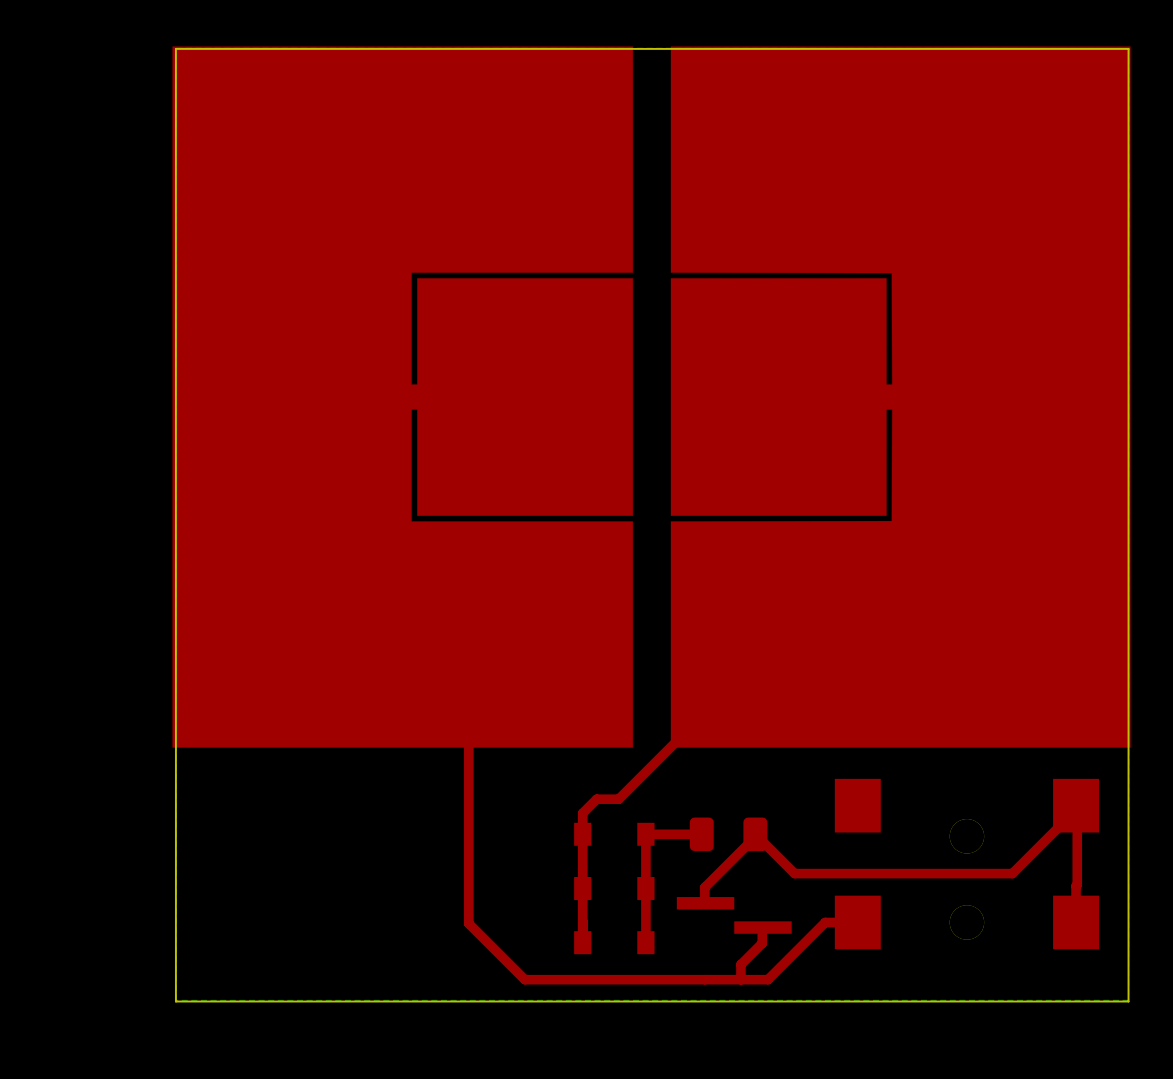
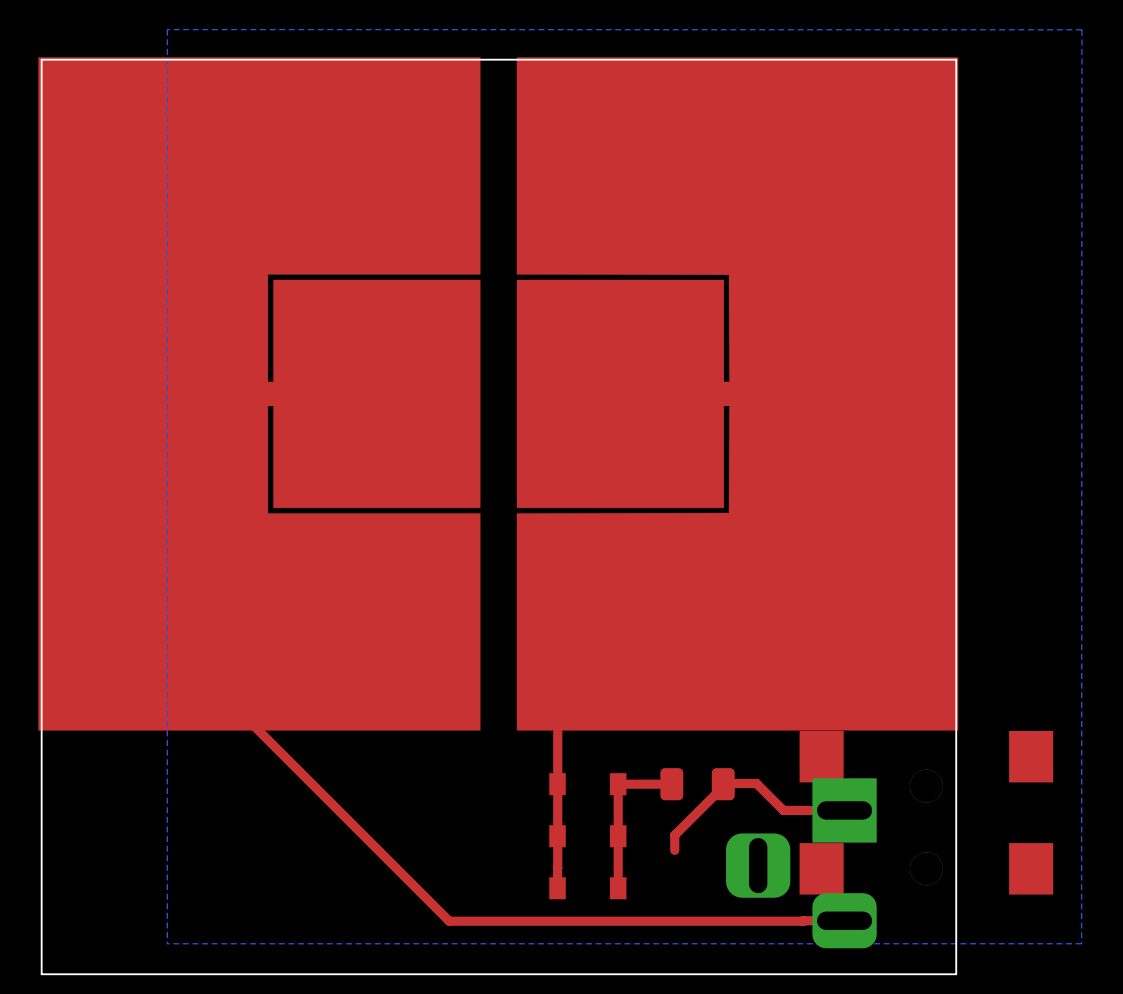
drawing position: (651, 524) -> (498, 516)
top track: none -> (235, 592) (235, 707) (449, 921) (802, 921) (803, 920) (844, 920) (807, 920) (804, 923)
top track: (468, 708) (468, 923) (524, 979) (768, 979) (825, 922) (857, 922) -> none
top track: (684, 733) (618, 799) (596, 799) (582, 813) (582, 834) -> none
top track: (1079, 800) (1077, 800) (1076, 922) -> none
top track: (1072, 813) (1012, 873) (794, 873) (755, 834) -> none
top track: none -> (726, 783) (756, 783) (783, 810) (844, 810) (807, 810)
top track: (583, 835) (582, 921) -> (557, 699) (557, 867)
part: (734, 915) -> none
part: none -> (801, 863)
top track: (762, 927) (762, 943) (740, 964) (740, 979) -> none

